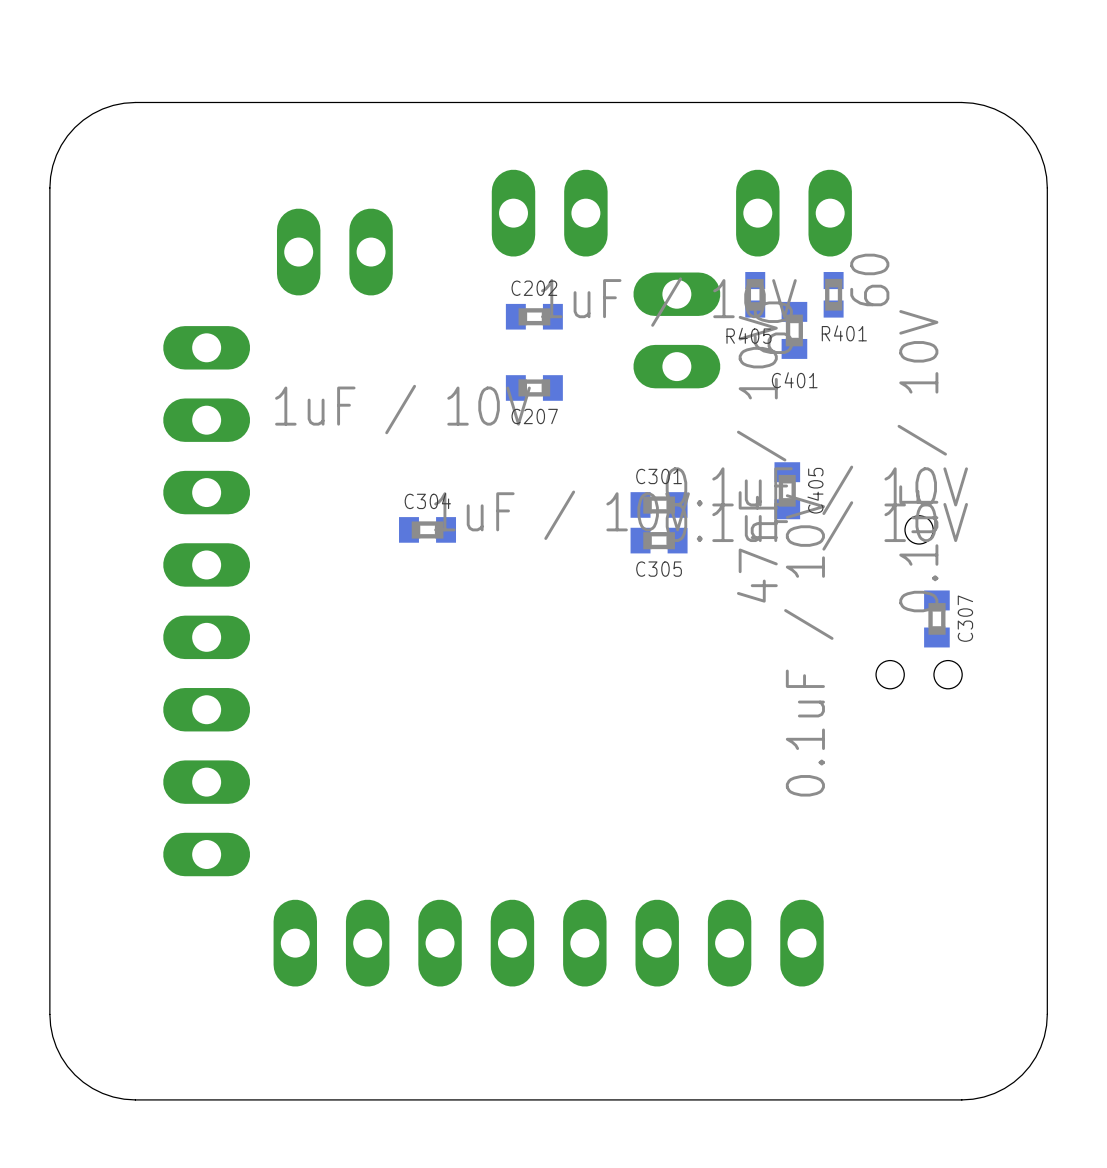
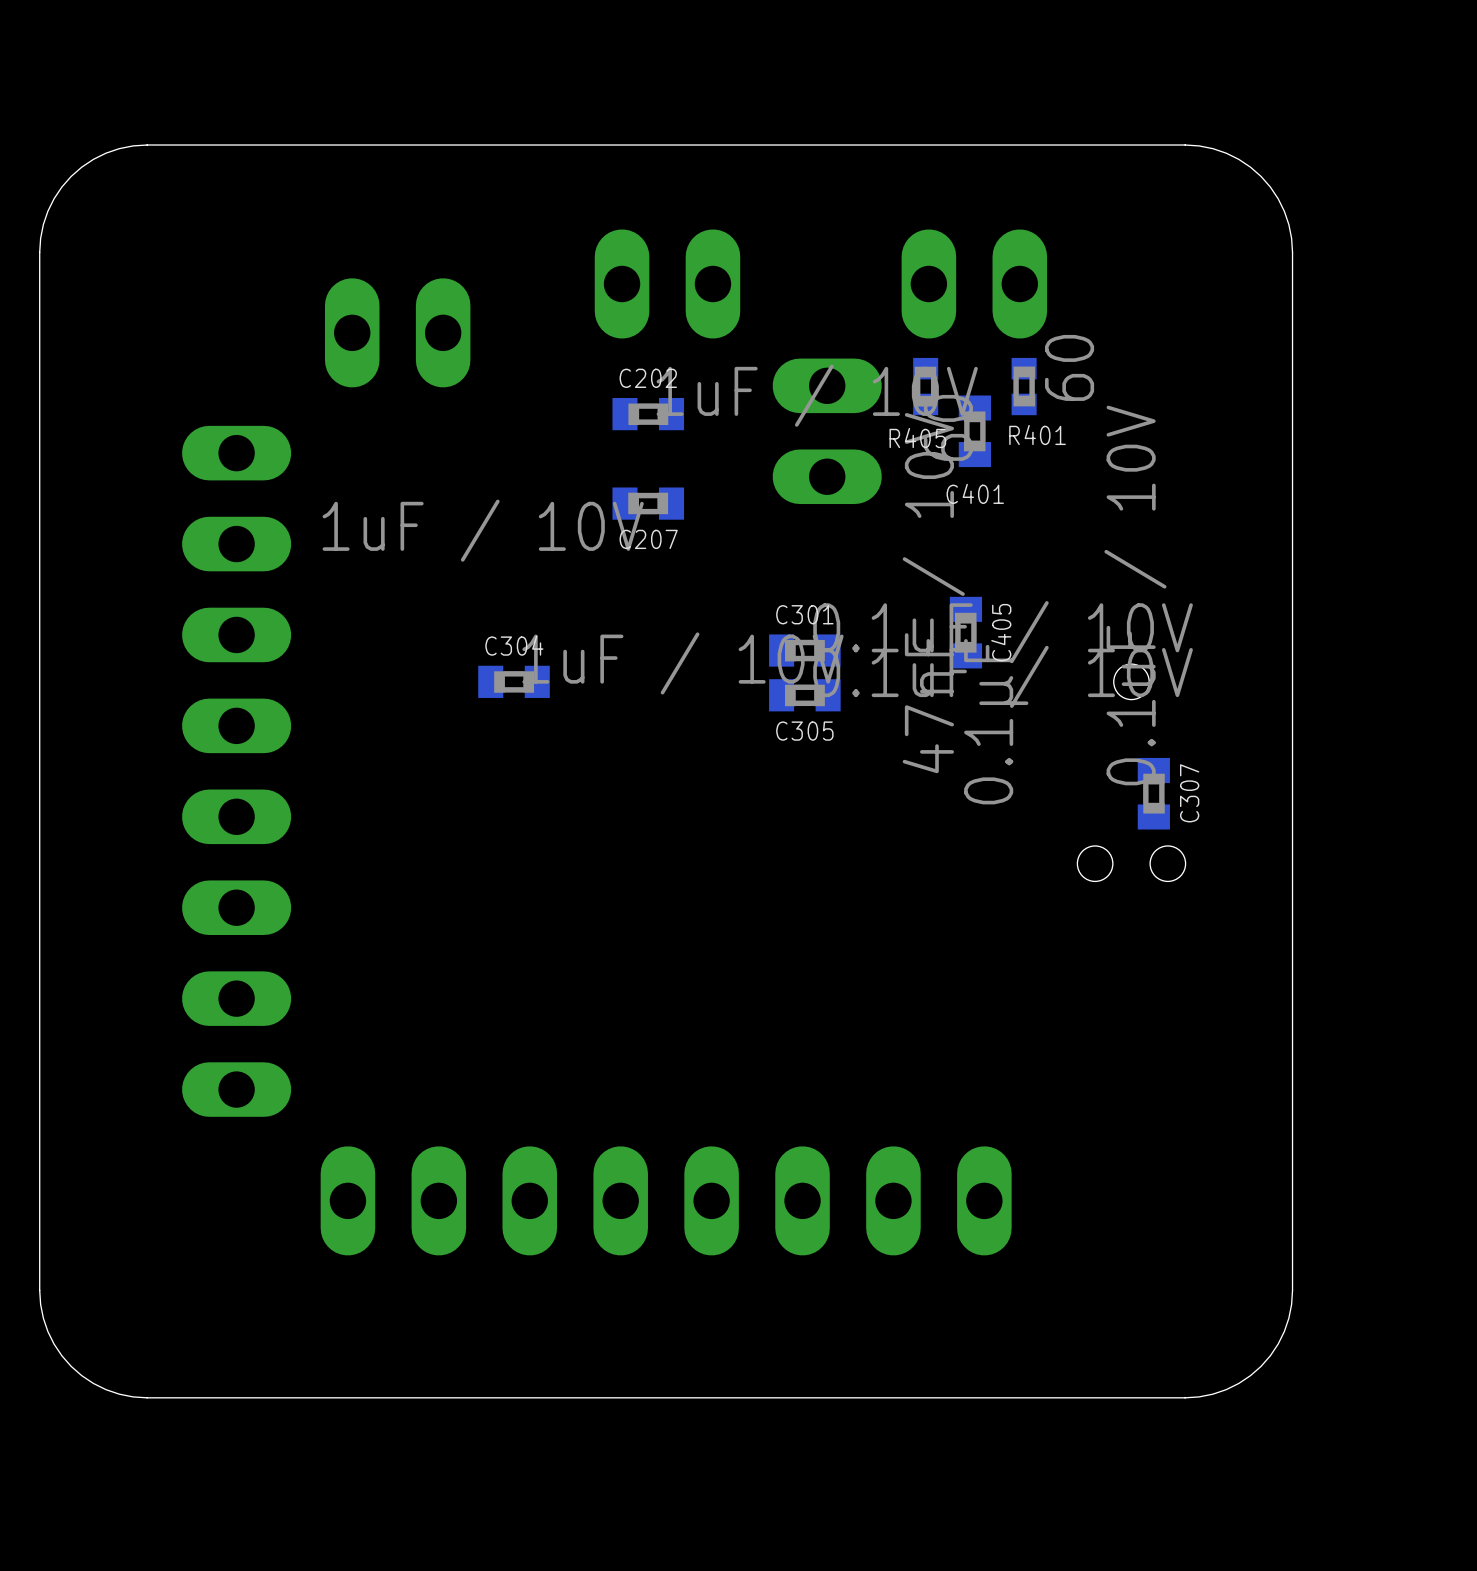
C405 value: 0.1uF / 10V (808, 645) -> 0.1μF (996, 721)

